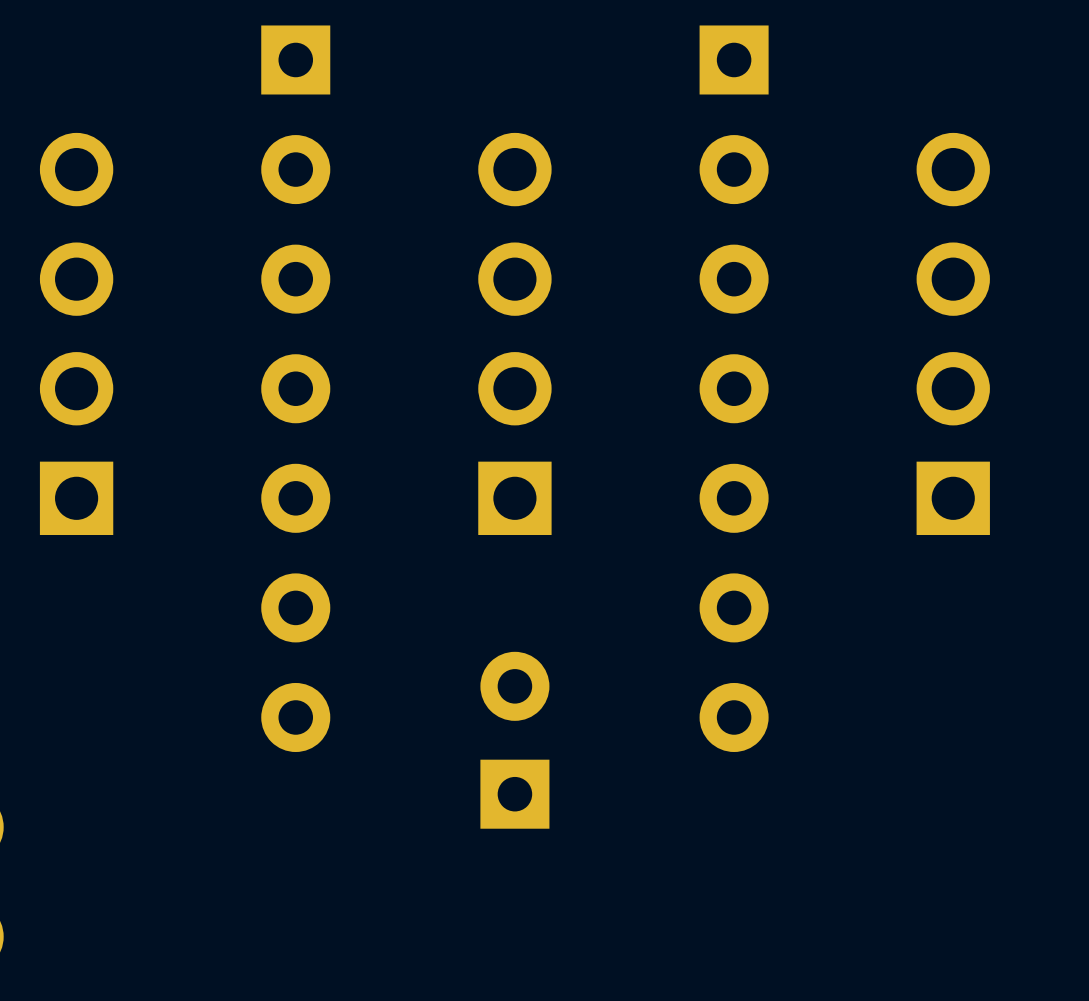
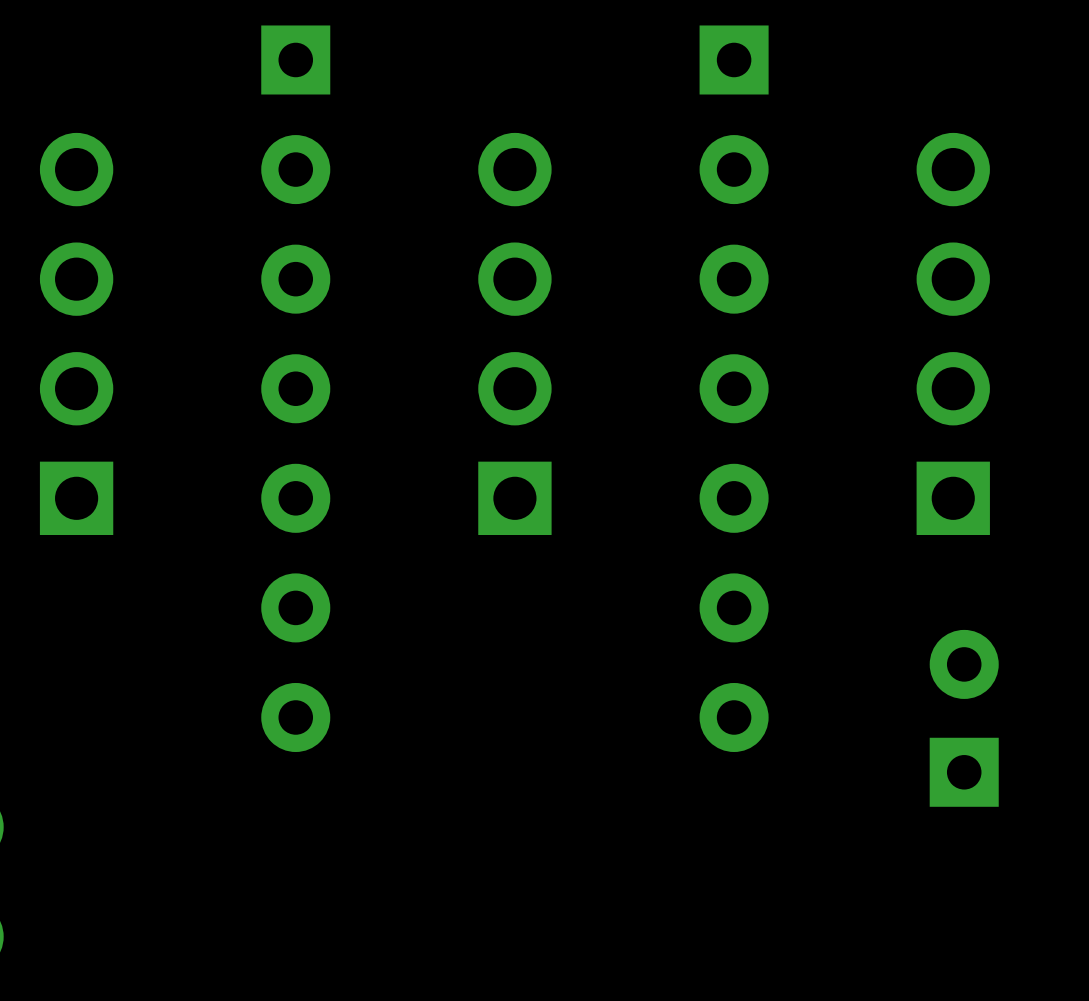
part position: (514, 740) -> (964, 718)

